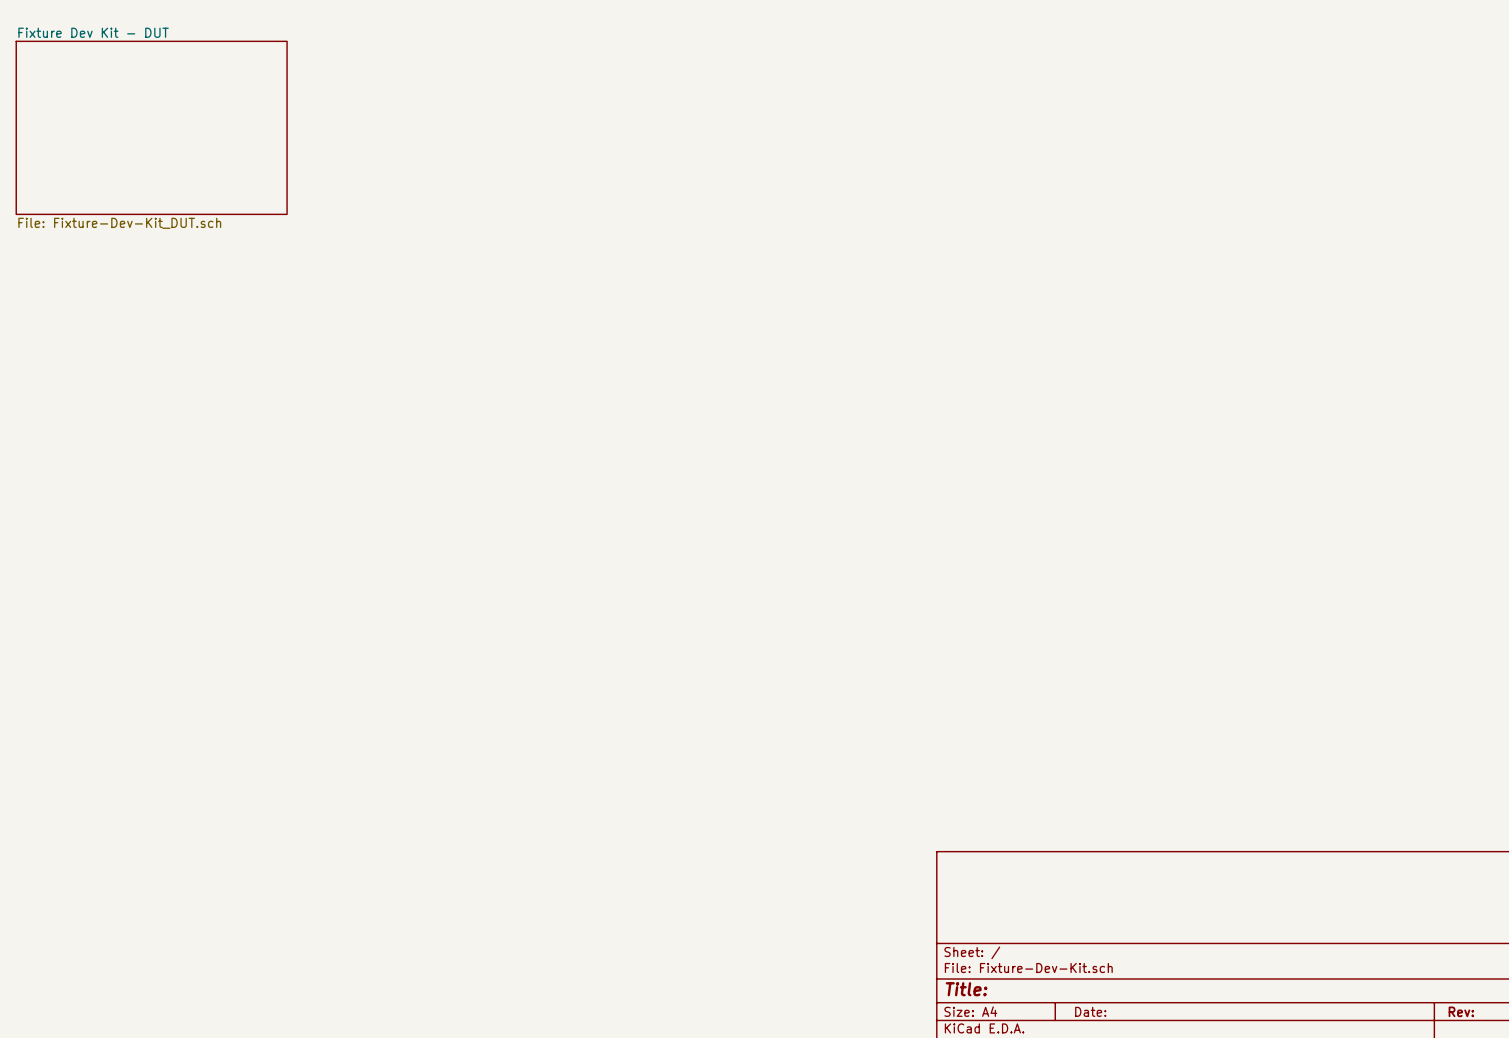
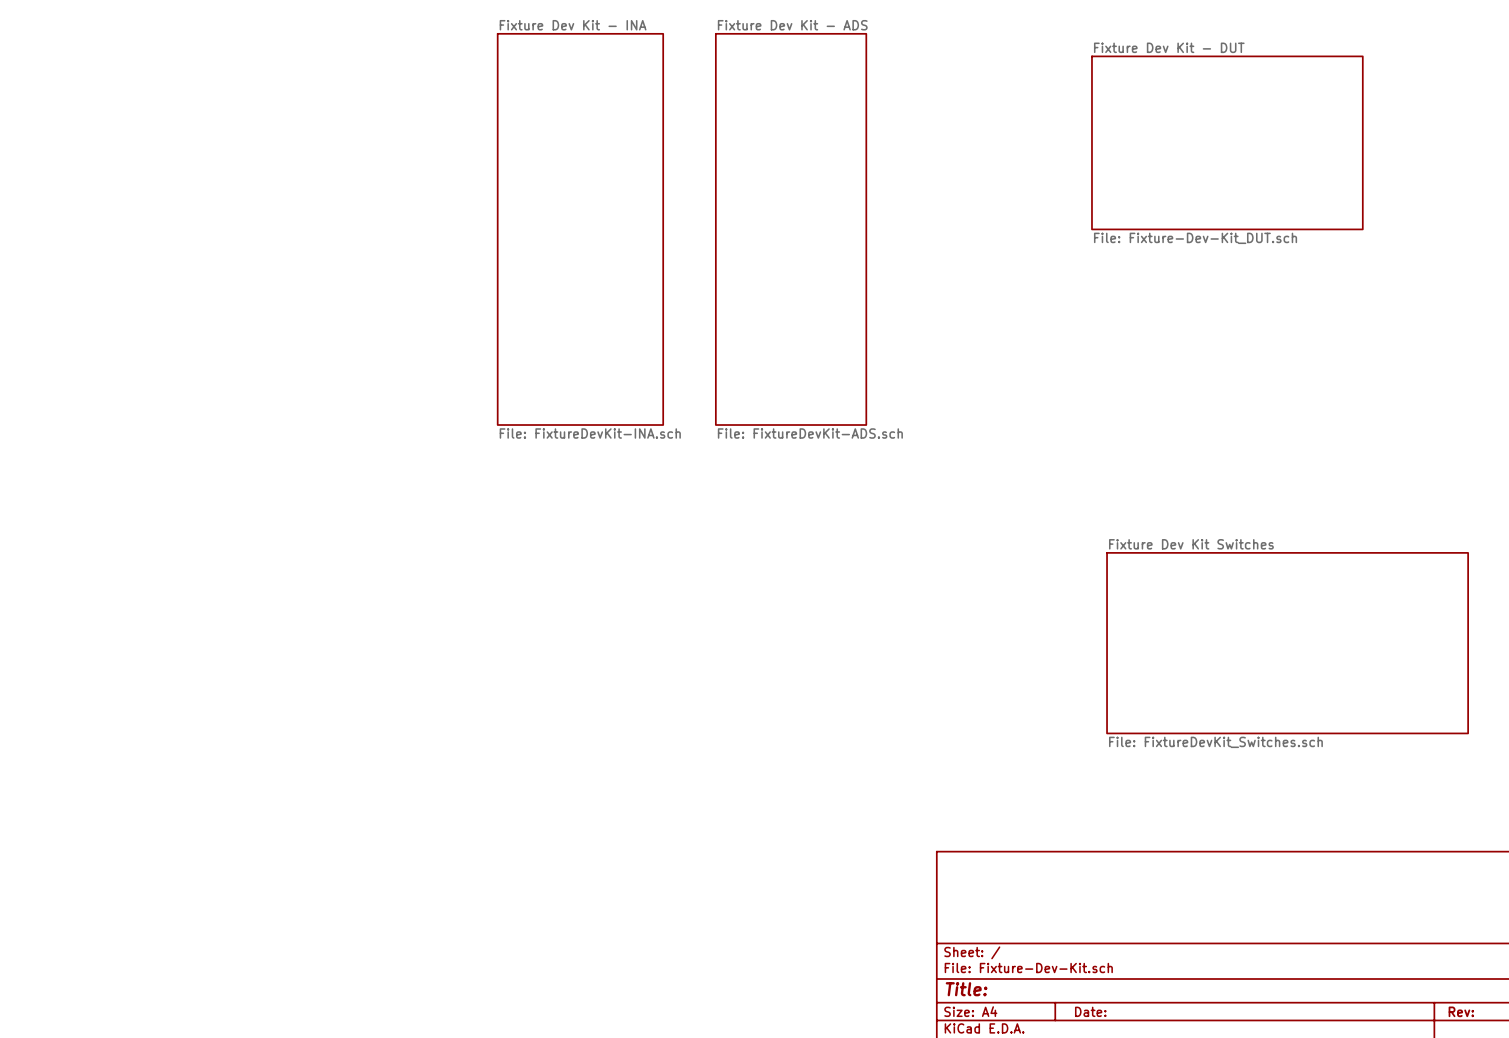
sheet Fixture Dev Kit - DUT: File: Fixture-Dev-Kit_DUT.sch (151, 127) -> none
sheet Fixture Dev Kit - DUT: none -> File: Fixture-Dev-Kit_DUT.sch (1227, 142)
sheet Fixture Dev Kit - INA: none -> File: FixtureDevKit-INA.sch (580, 229)
sheet Fixture Dev Kit - ADS: none -> File: FixtureDevKit-ADS.sch (791, 229)
sheet Fixture Dev Kit Switches: none -> File: FixtureDevKit_Switches.sch (1287, 643)

